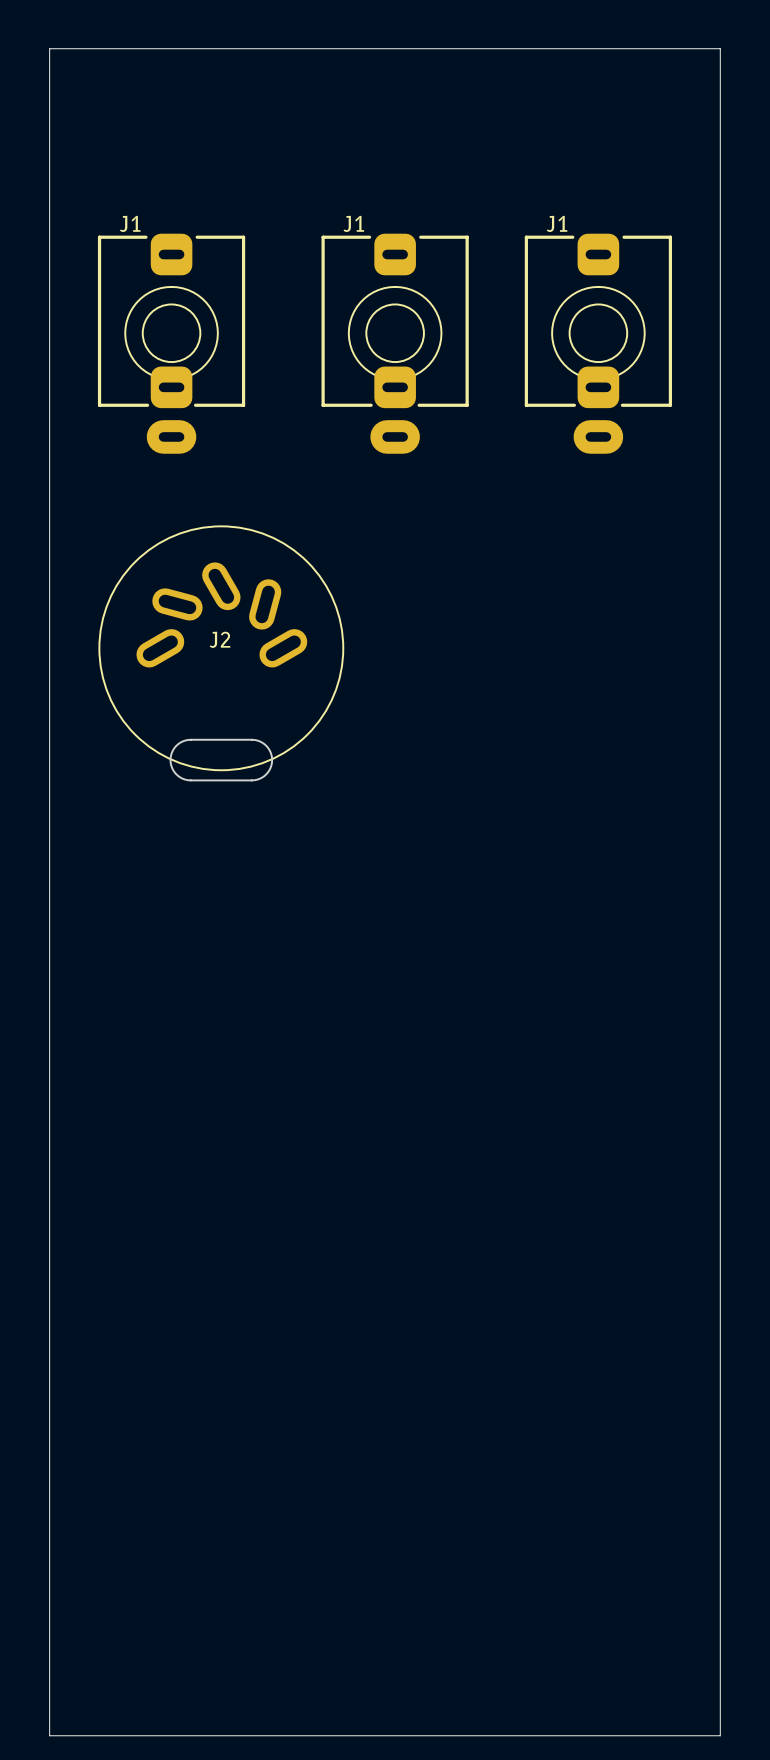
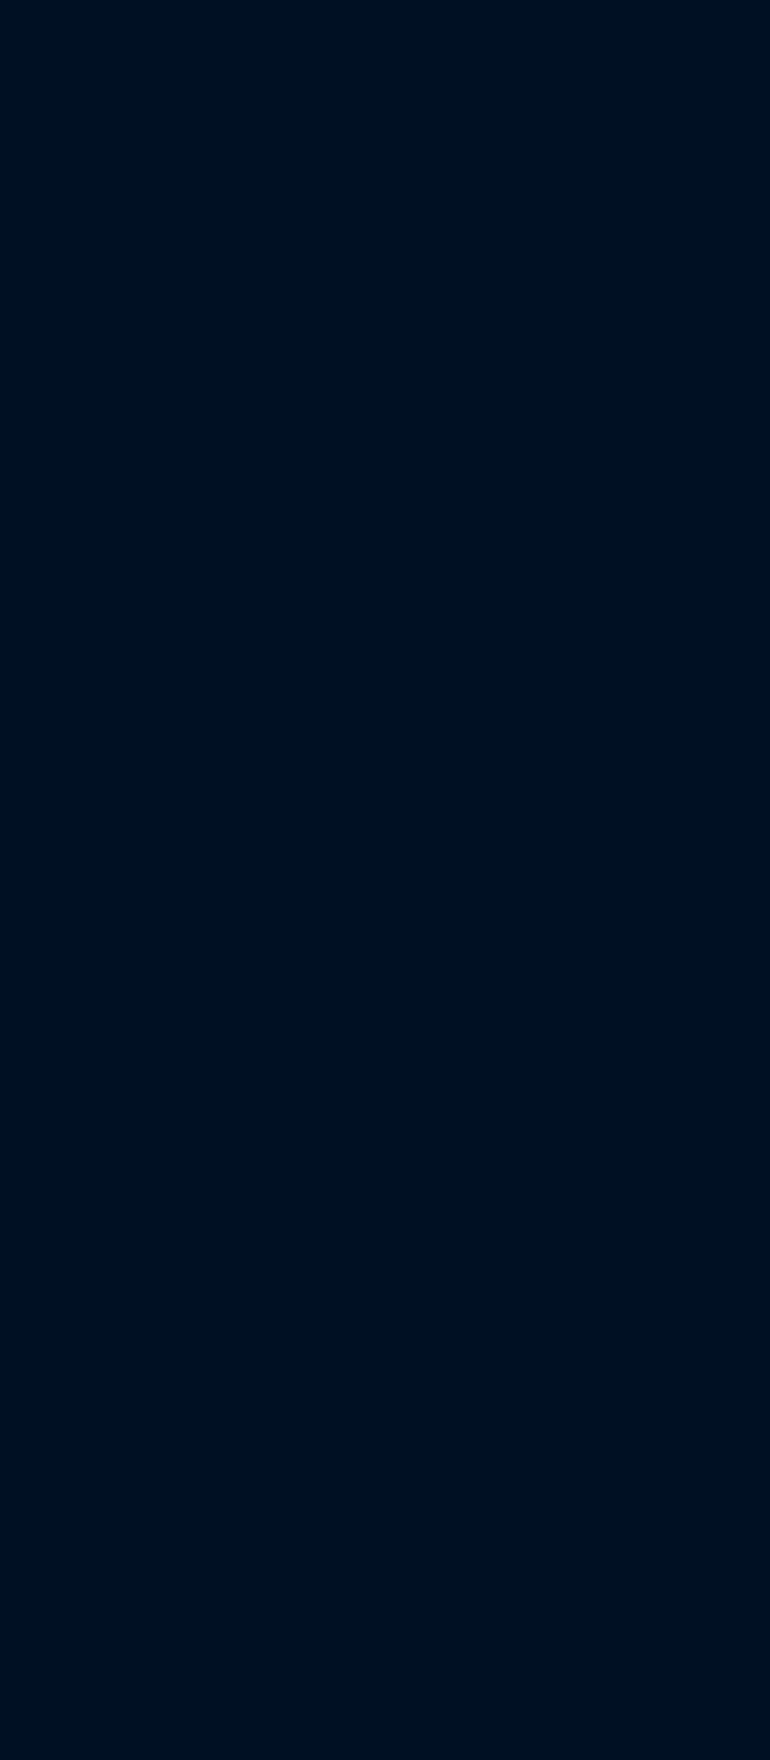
board edge: (49, 48) (720, 48) (720, 1735) (49, 1735) (49, 48) -> none
J1: (171, 343) -> none
J1: (395, 343) -> none
J1: (598, 343) -> none
J2: (221, 653) -> none

